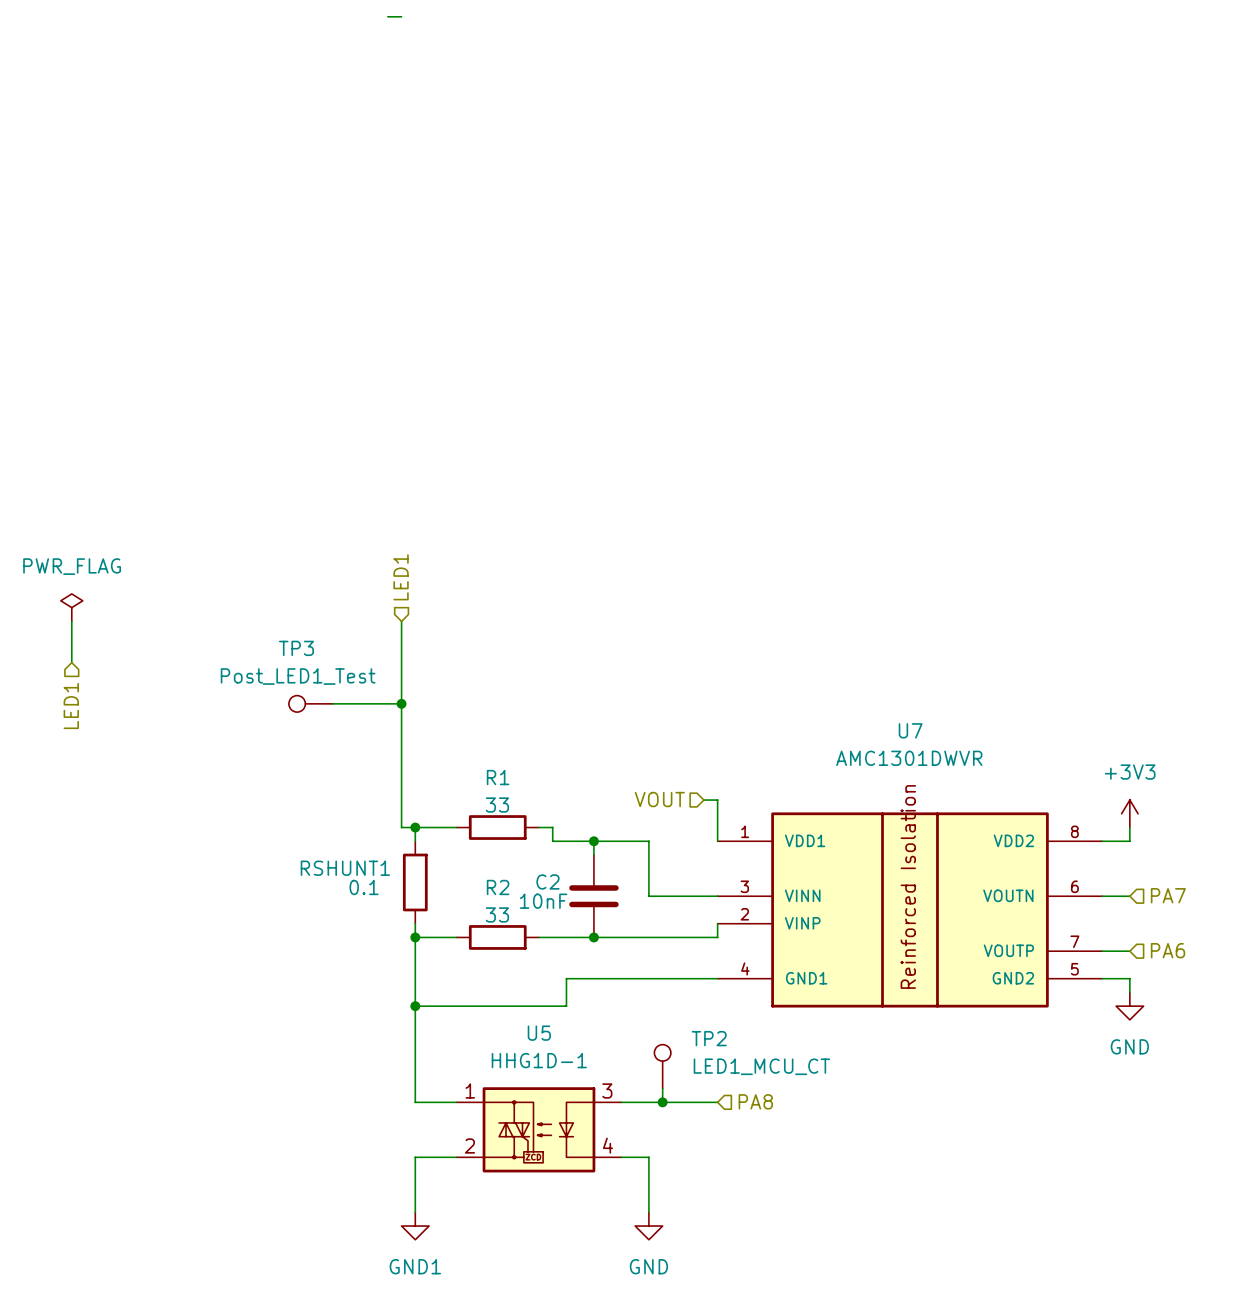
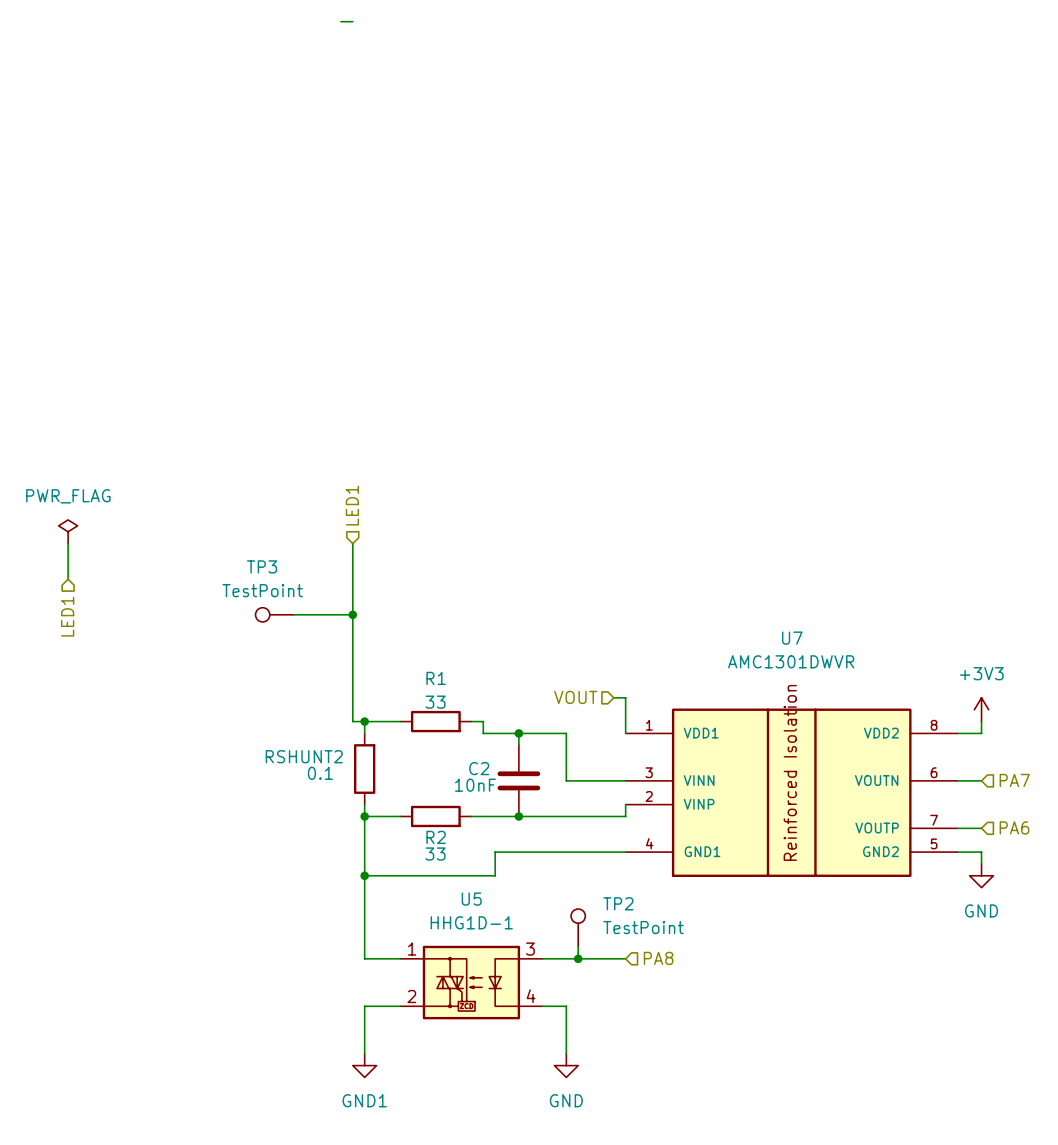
TP3 value: Post_LED1_Test (298, 676) -> TestPoint (262, 590)
RSHUNT1 name: RSHUNT1 (345, 868) -> RSHUNT2 (304, 756)
R2 name position: R2 (498, 887) -> R2 (436, 837)
R2 value position: 33 (497, 914) -> 33 (435, 854)
TP2 value: LED1_MCU_CT (761, 1066) -> TestPoint (643, 927)

